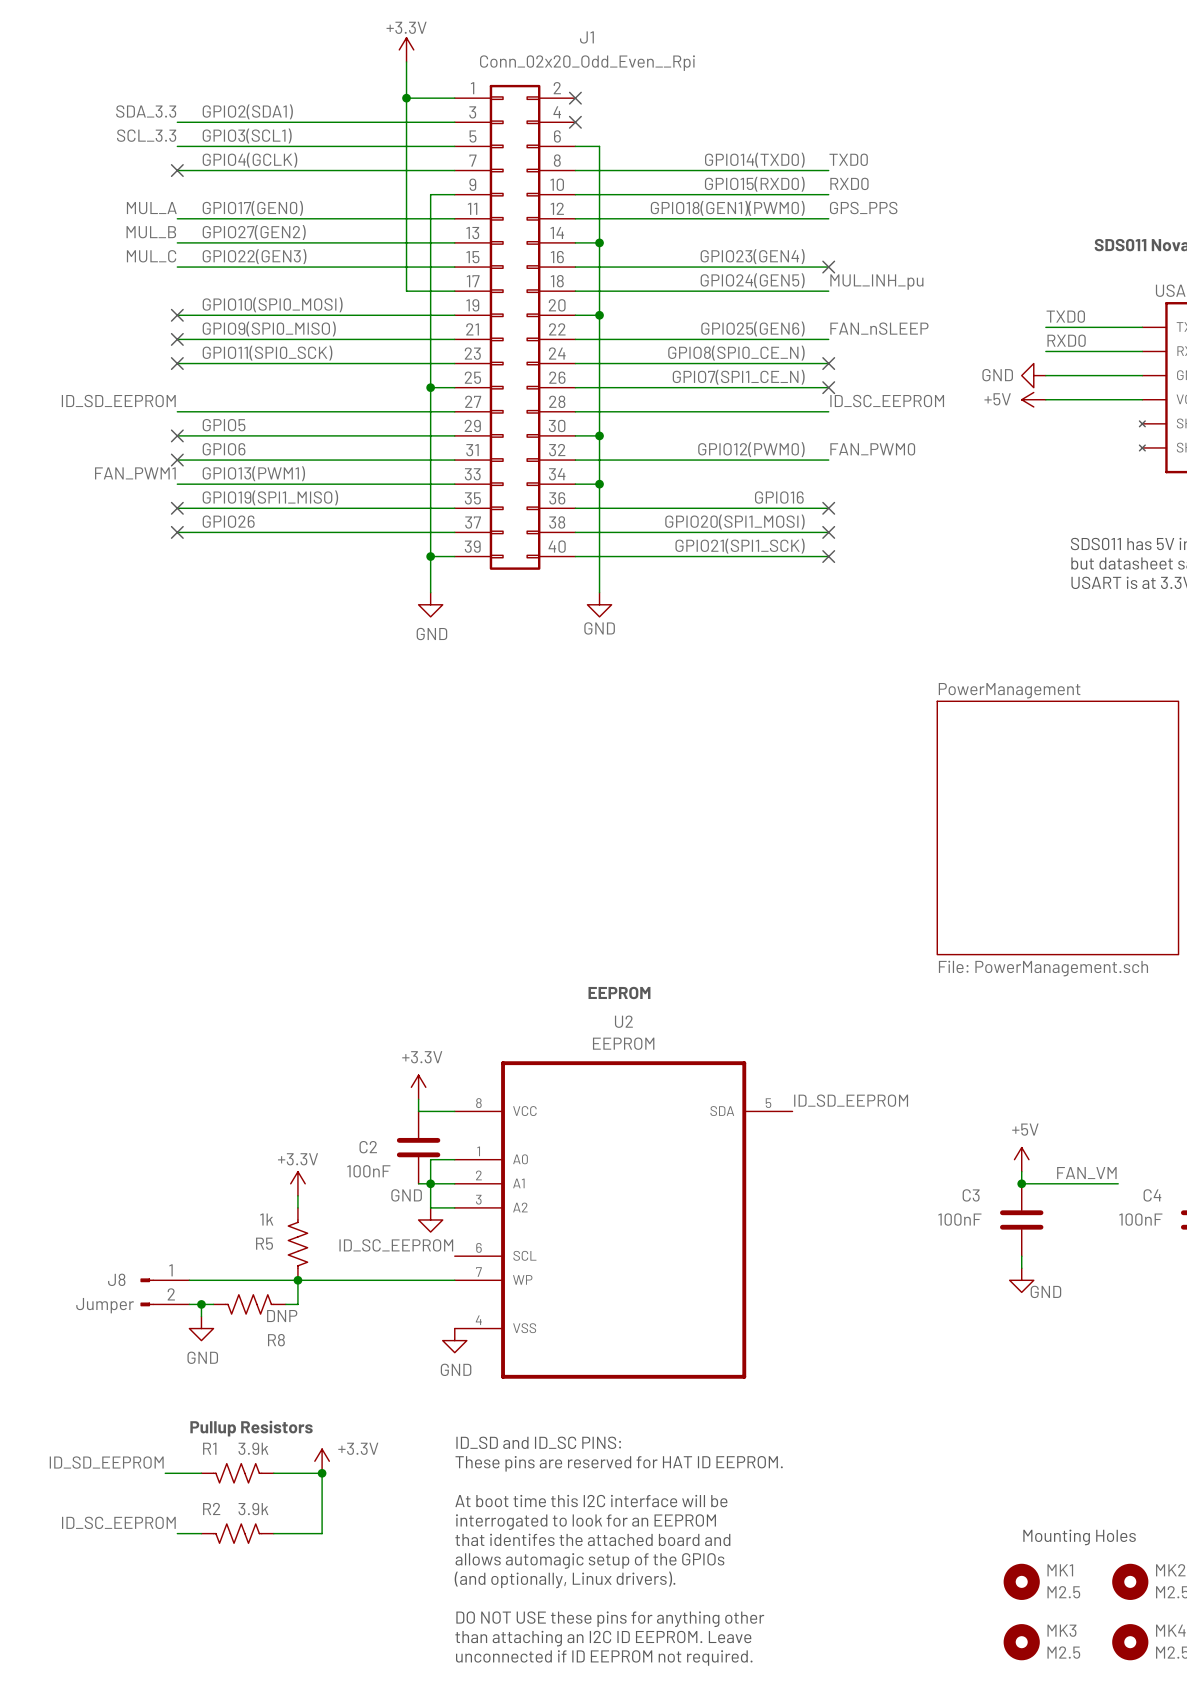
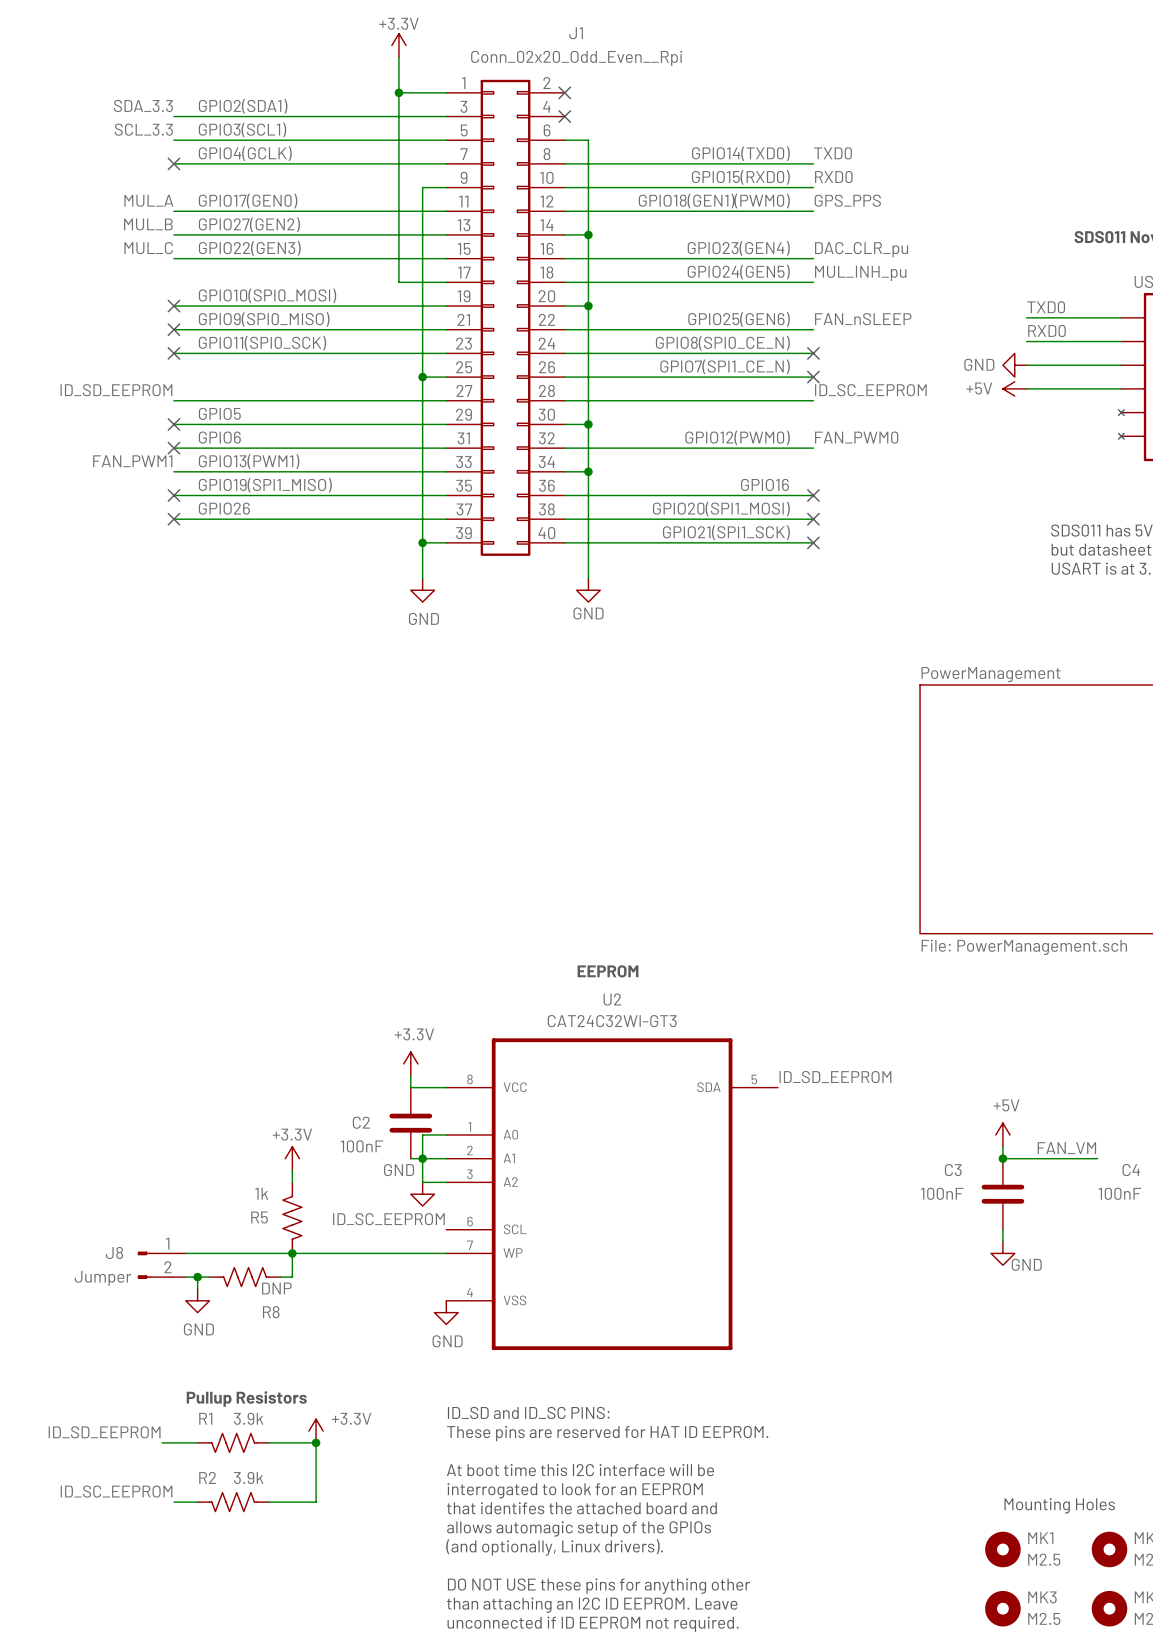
label: none -> DAC_CLR_pu (861, 249)
no-connect mark: (828, 267) -> none
U2 value: EEPROM (623, 1043) -> CAT24C32WI-GT3 (612, 1021)

